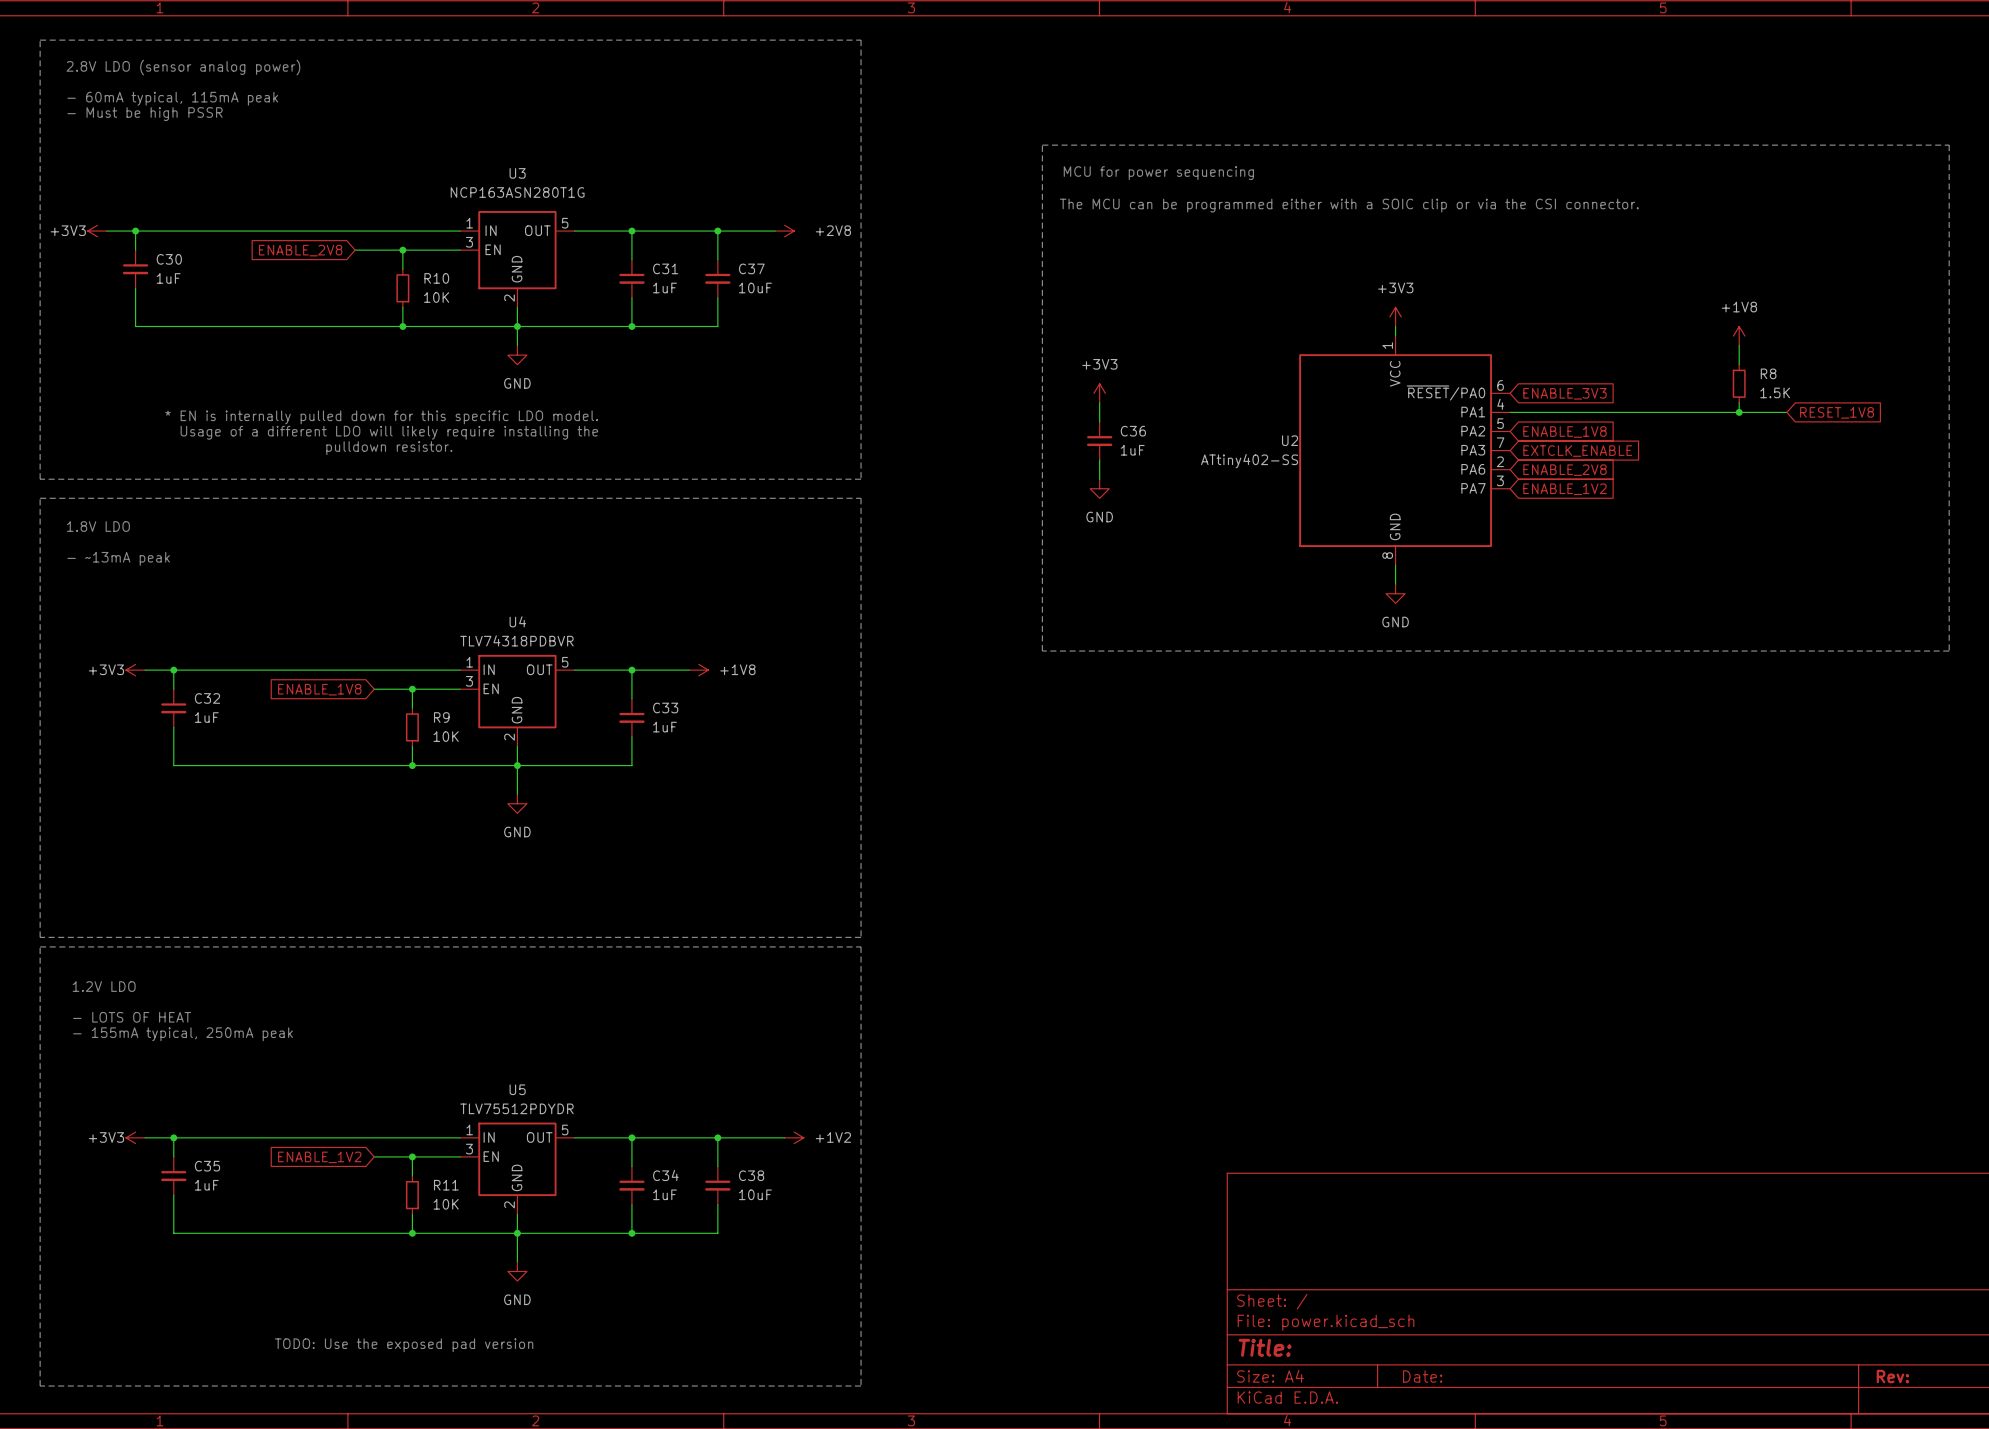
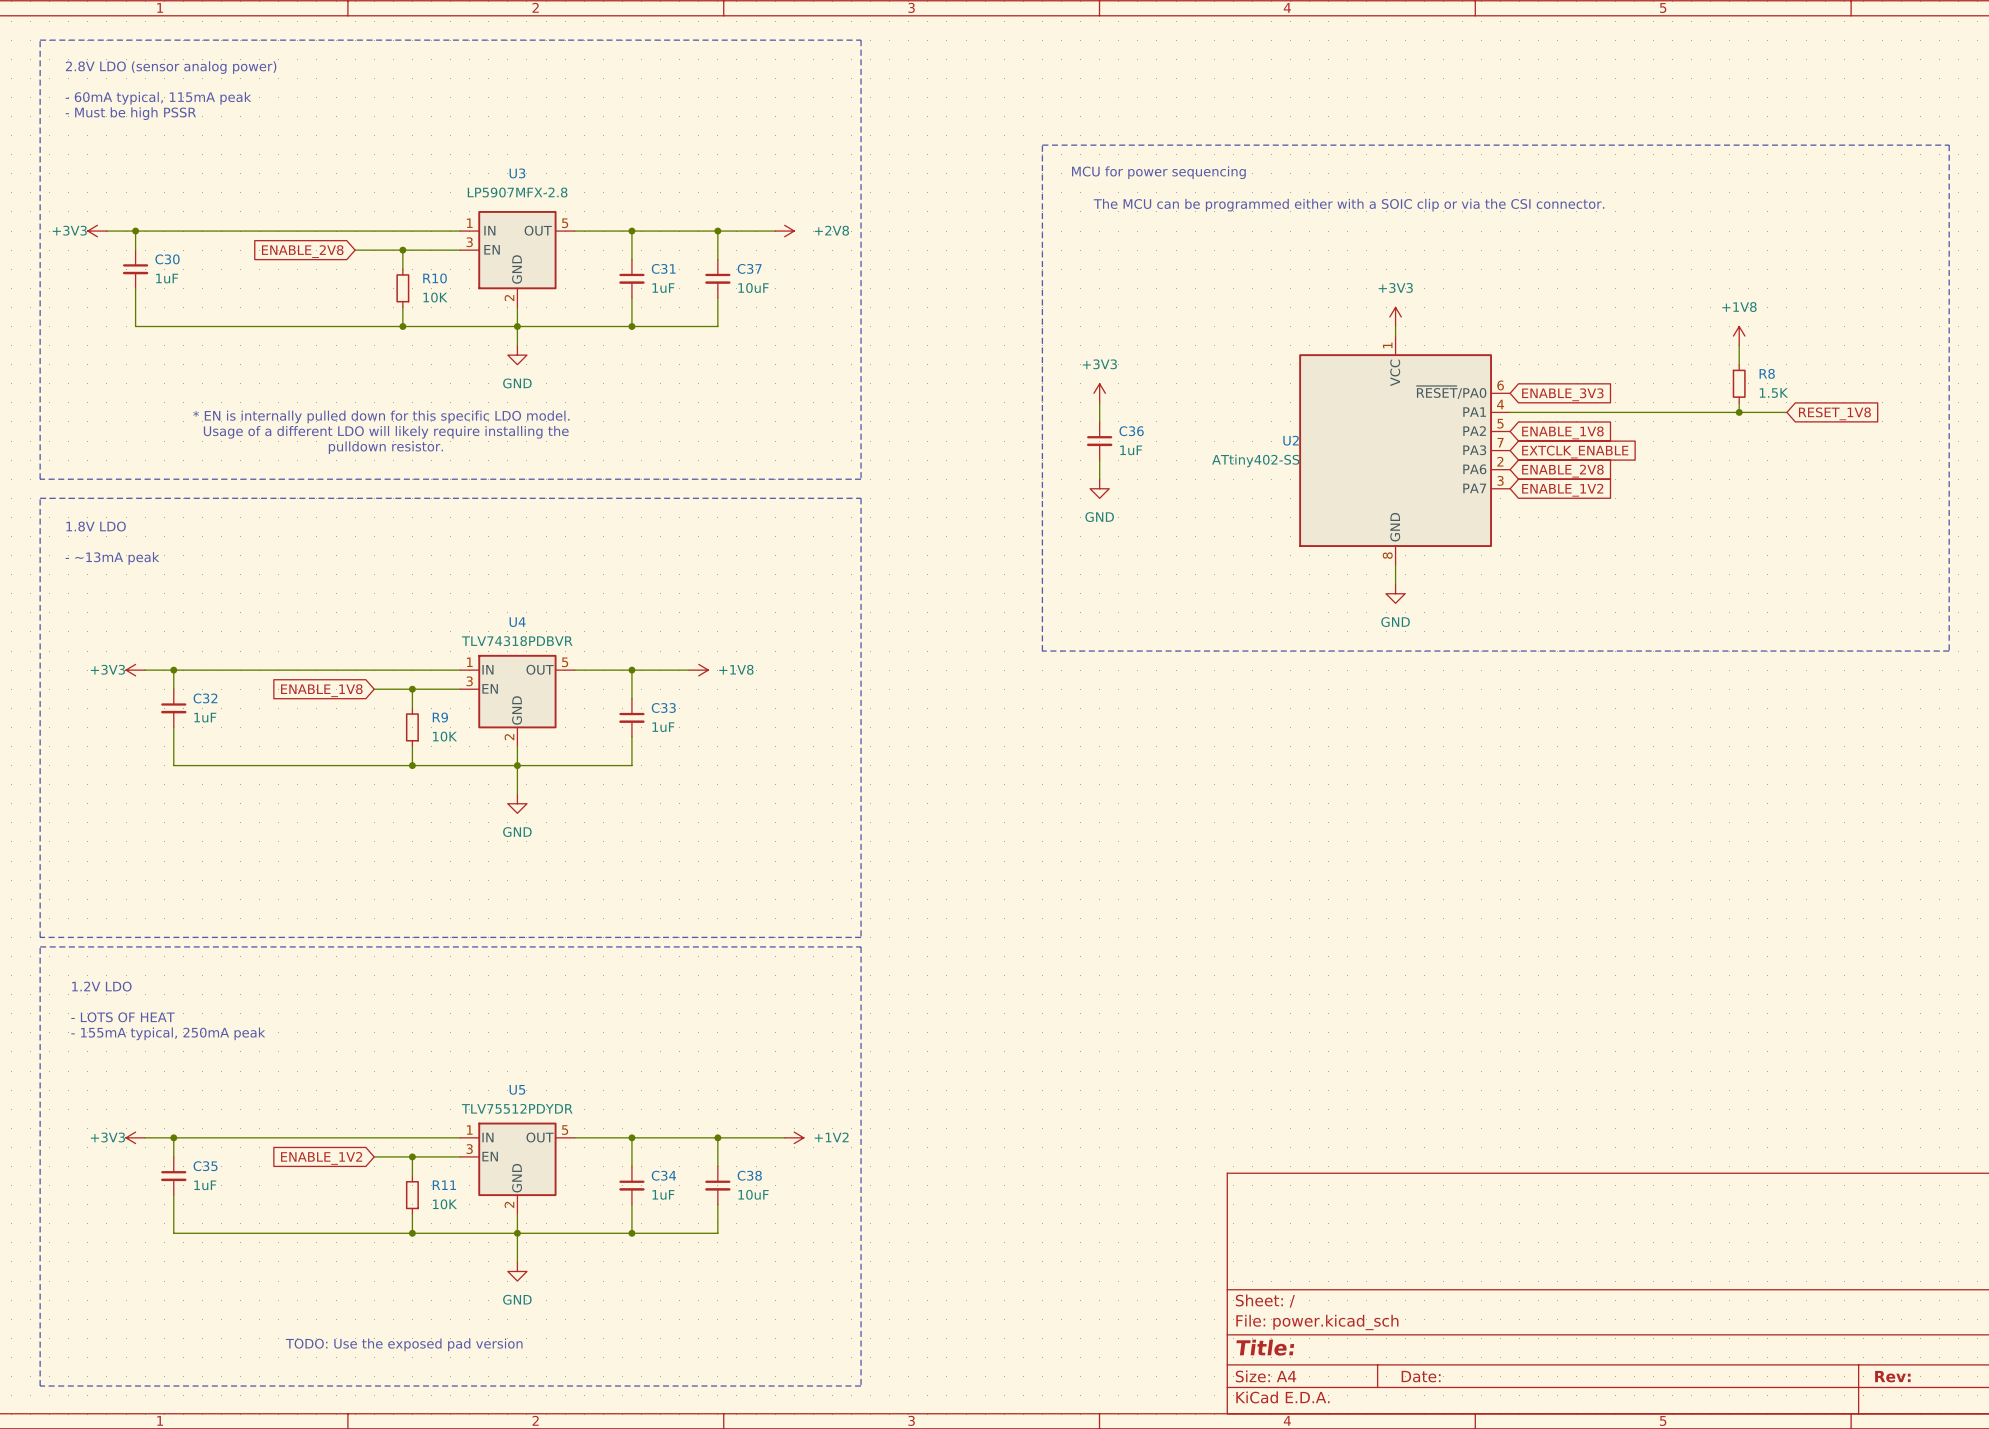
U3 value: NCP163ASN280T1G (517, 192) -> LP5907MFX-2.8 (517, 192)

